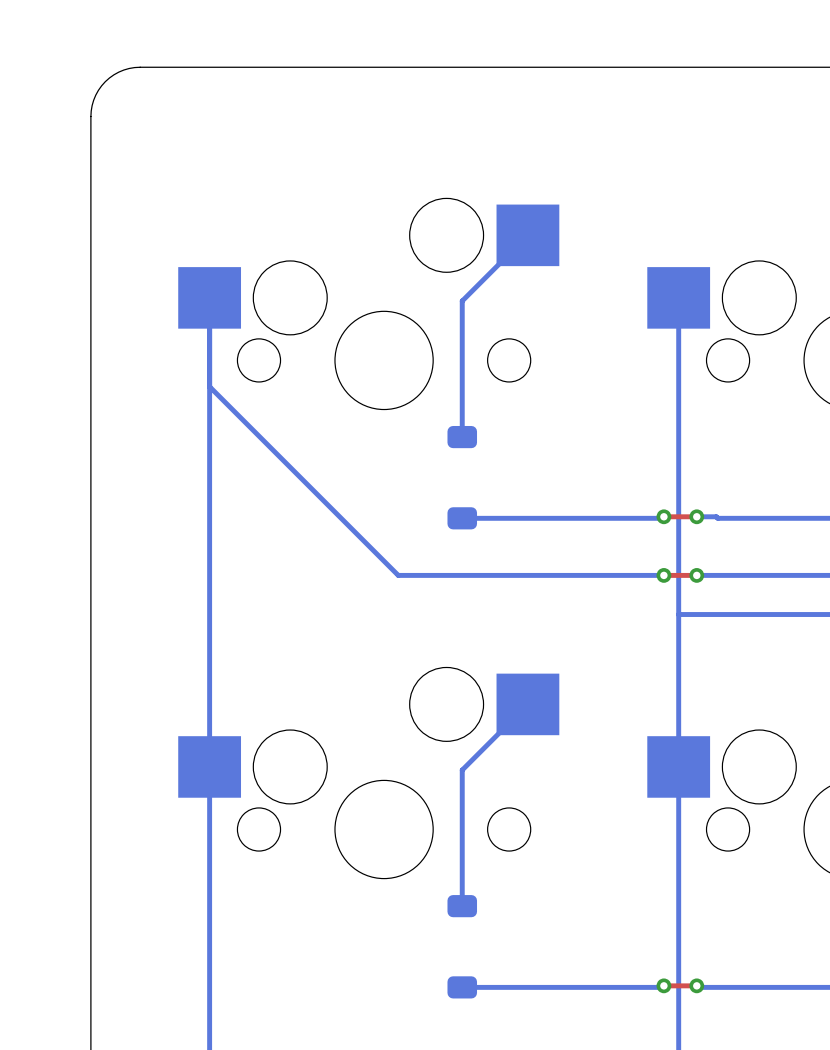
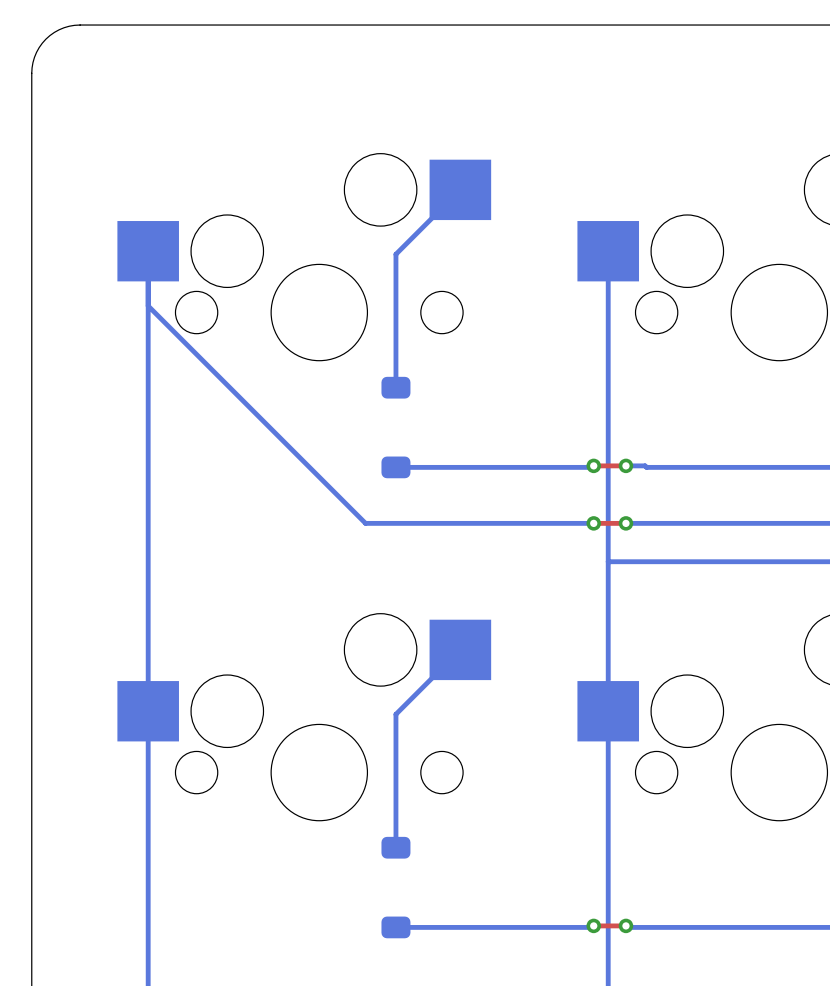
bottom track: (209, 386) (398, 575) (431, 575) -> (148, 305) (365, 523)

